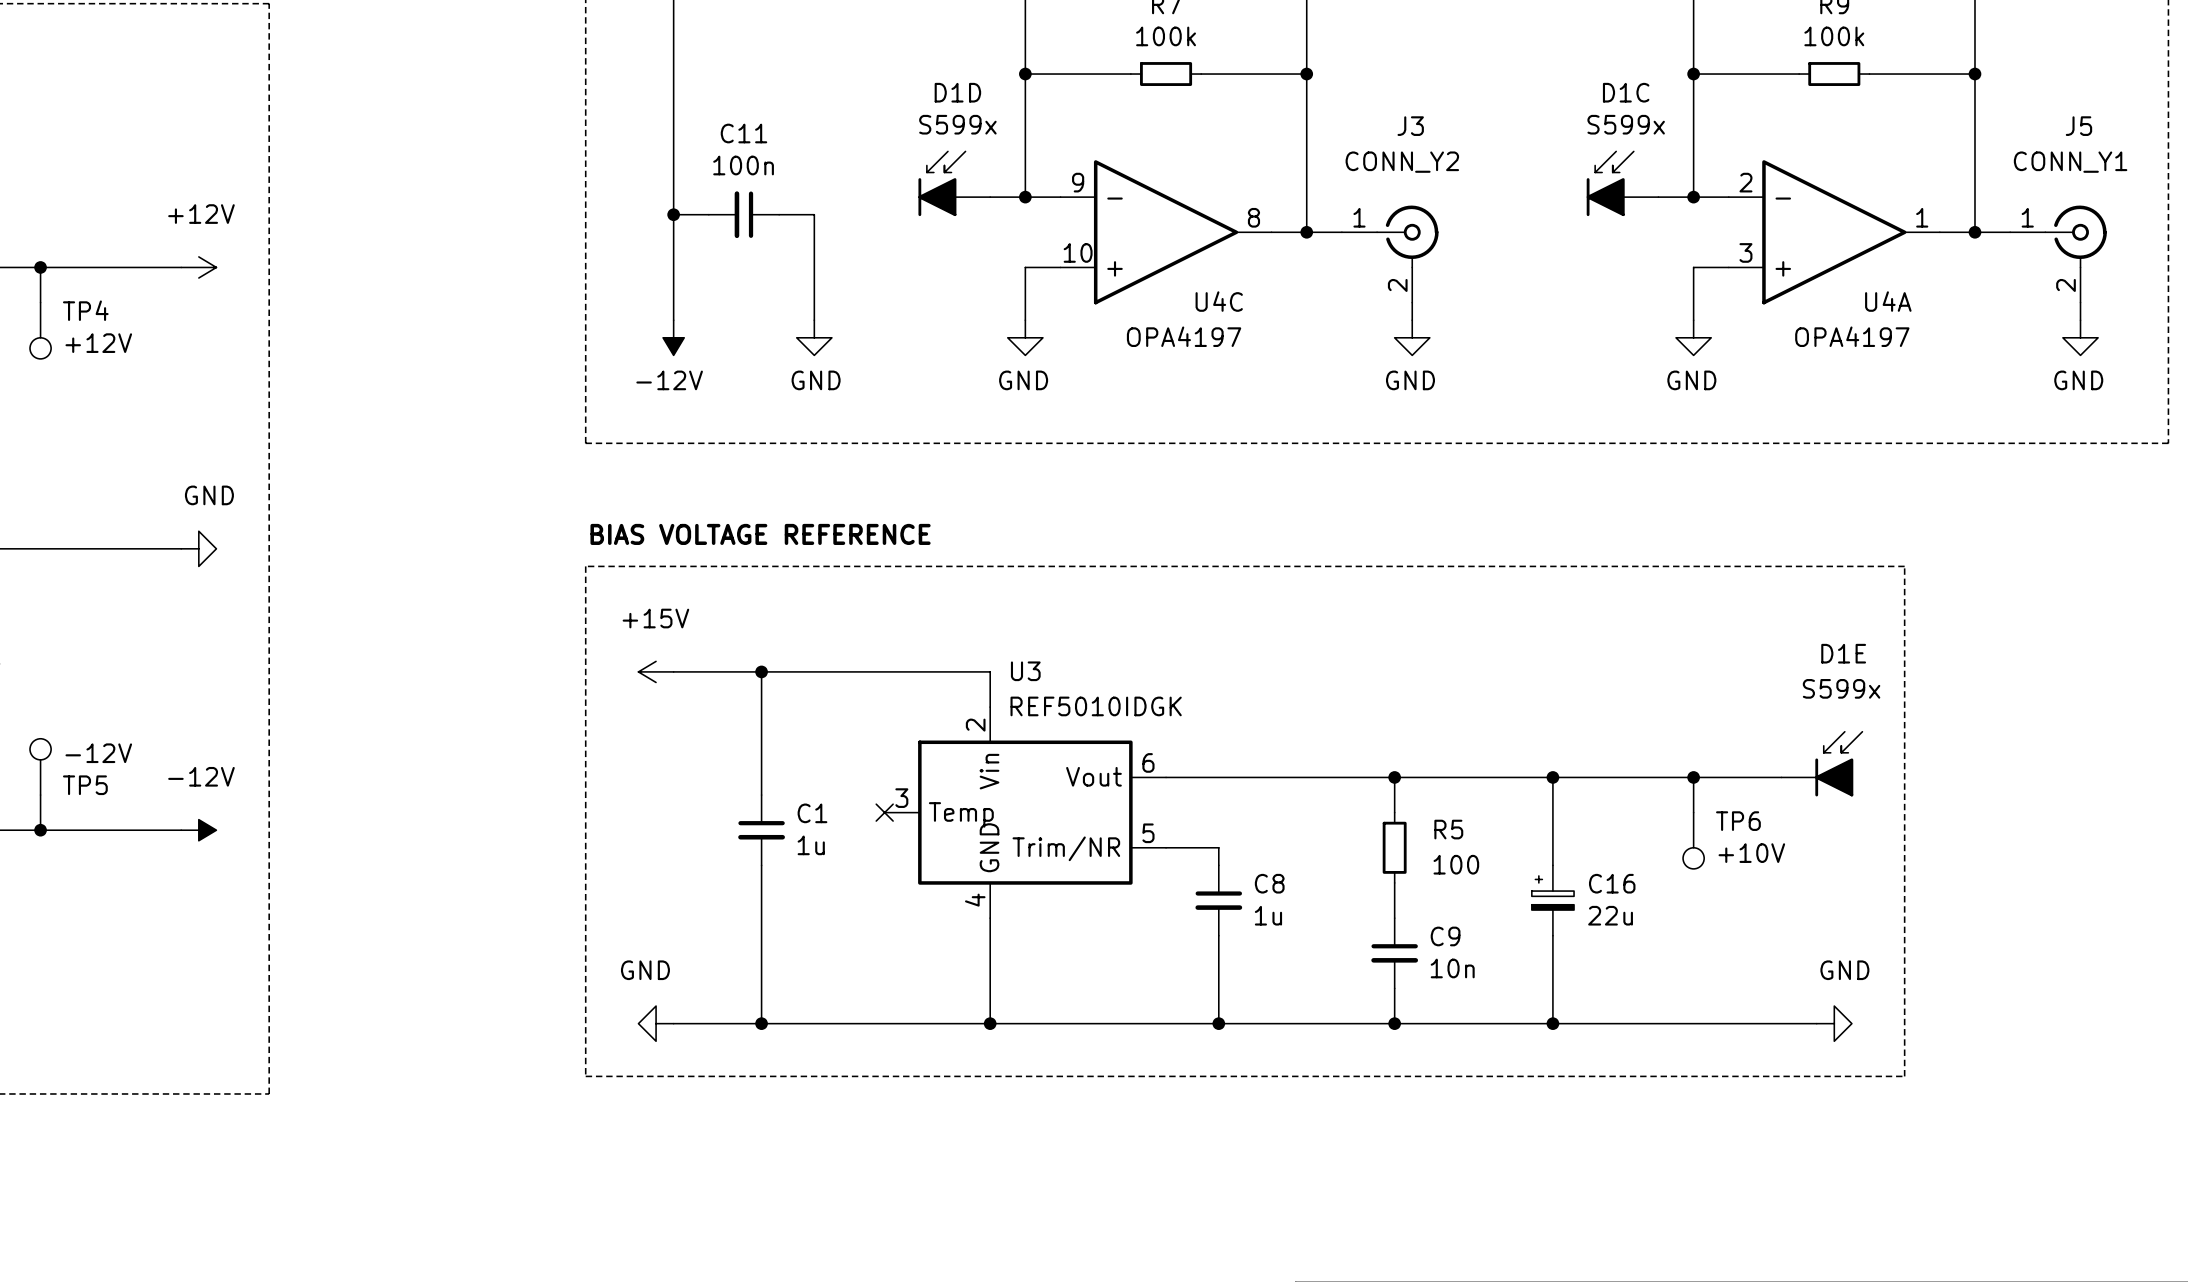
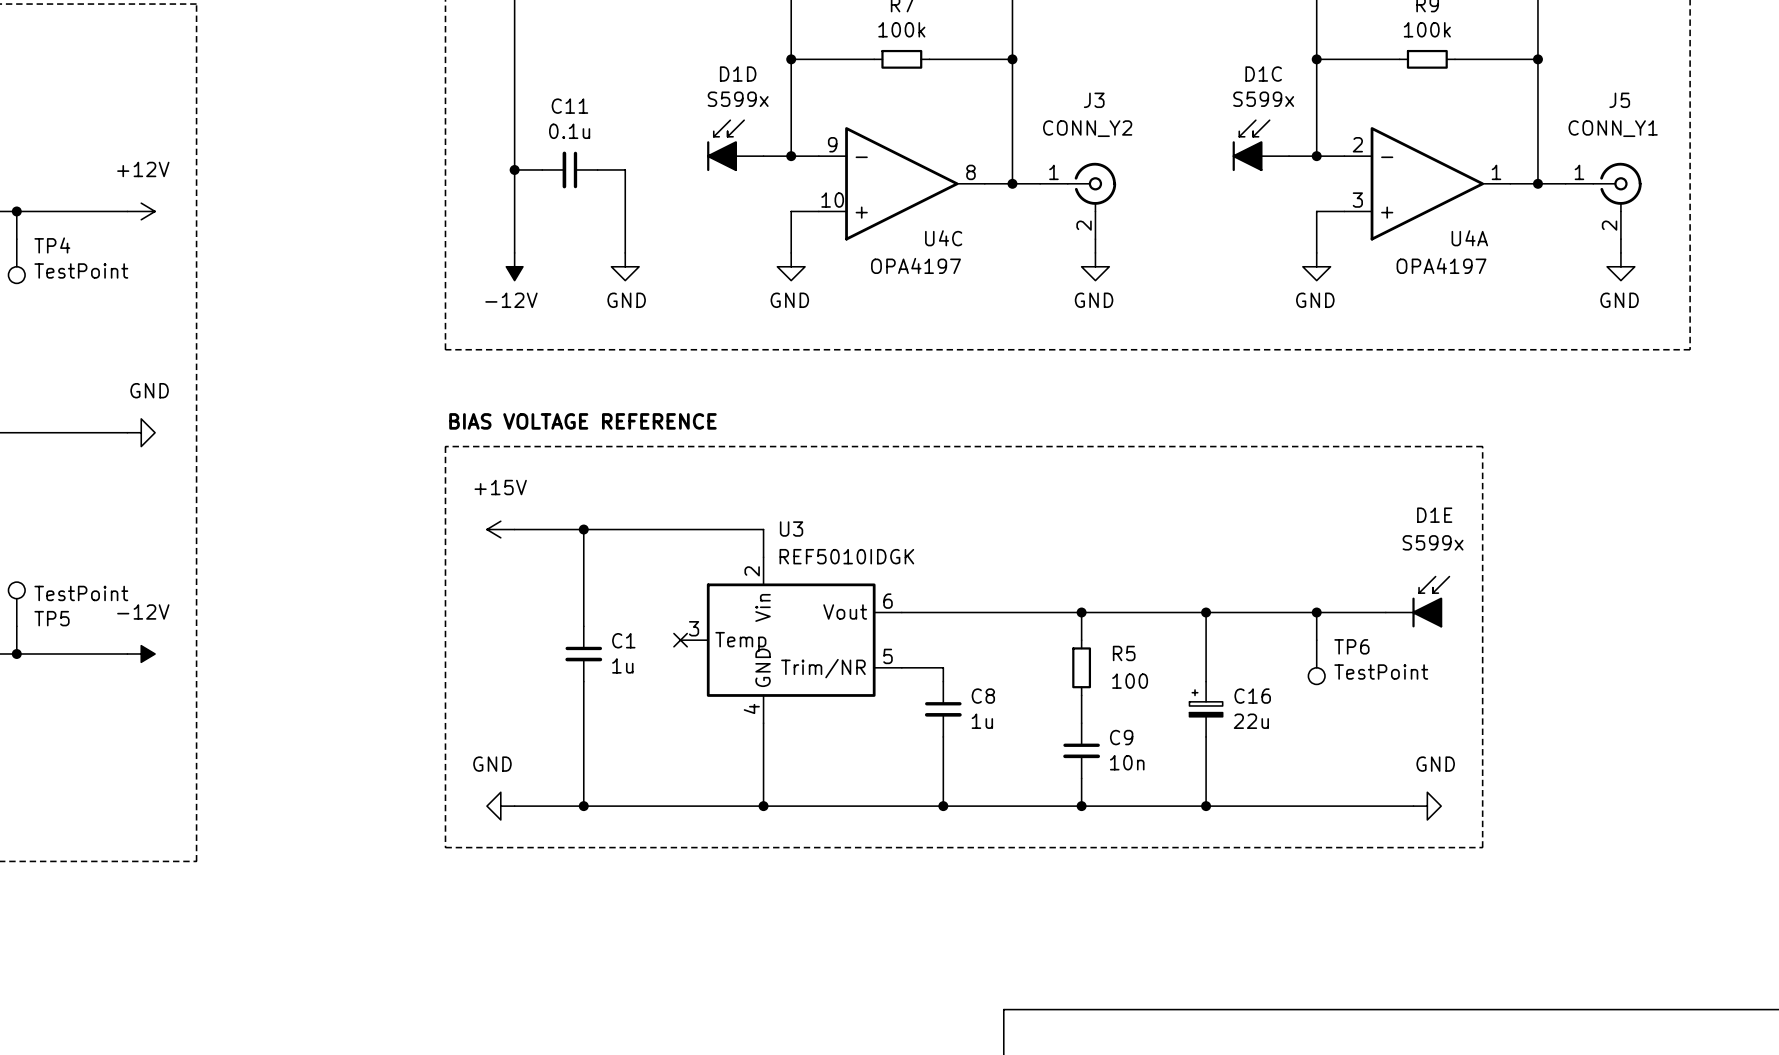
C11 value: 100n (743, 165) -> 0.1u (569, 131)
TP4 value: +12V (98, 343) -> TestPoint (81, 270)
TP5 value: -12V (98, 753) -> TestPoint (81, 593)
TP6 value: +10V (1751, 853) -> TestPoint (1381, 672)

